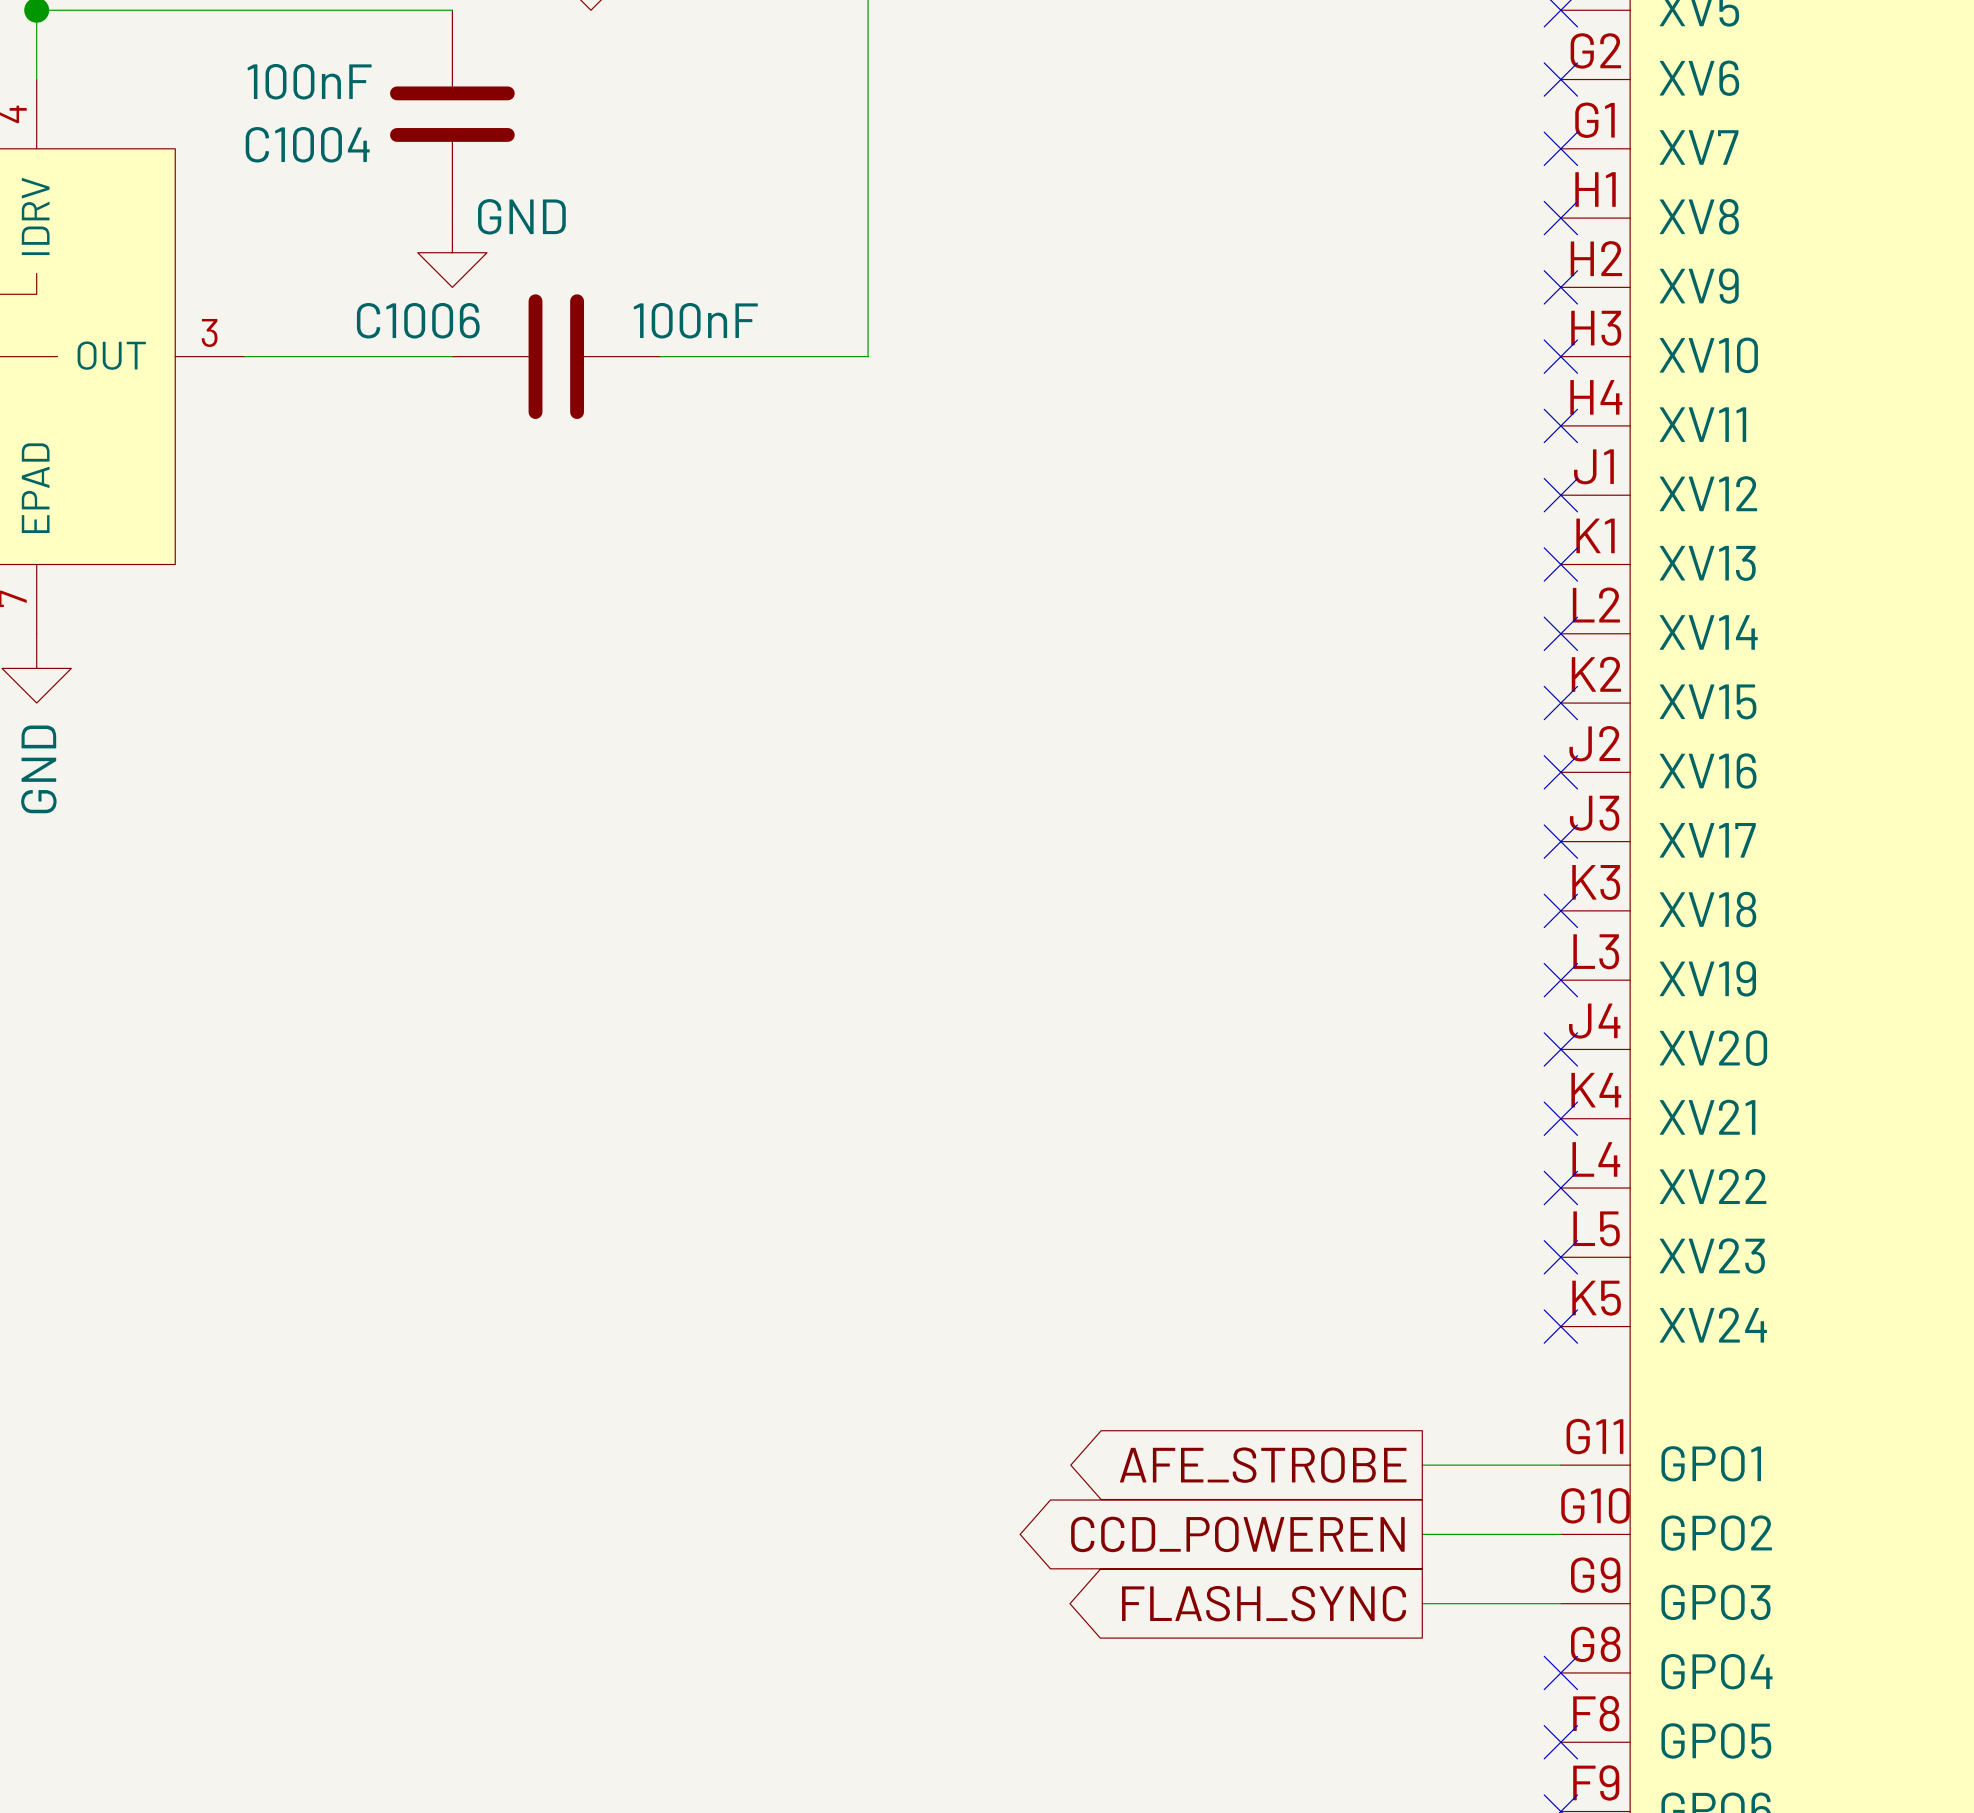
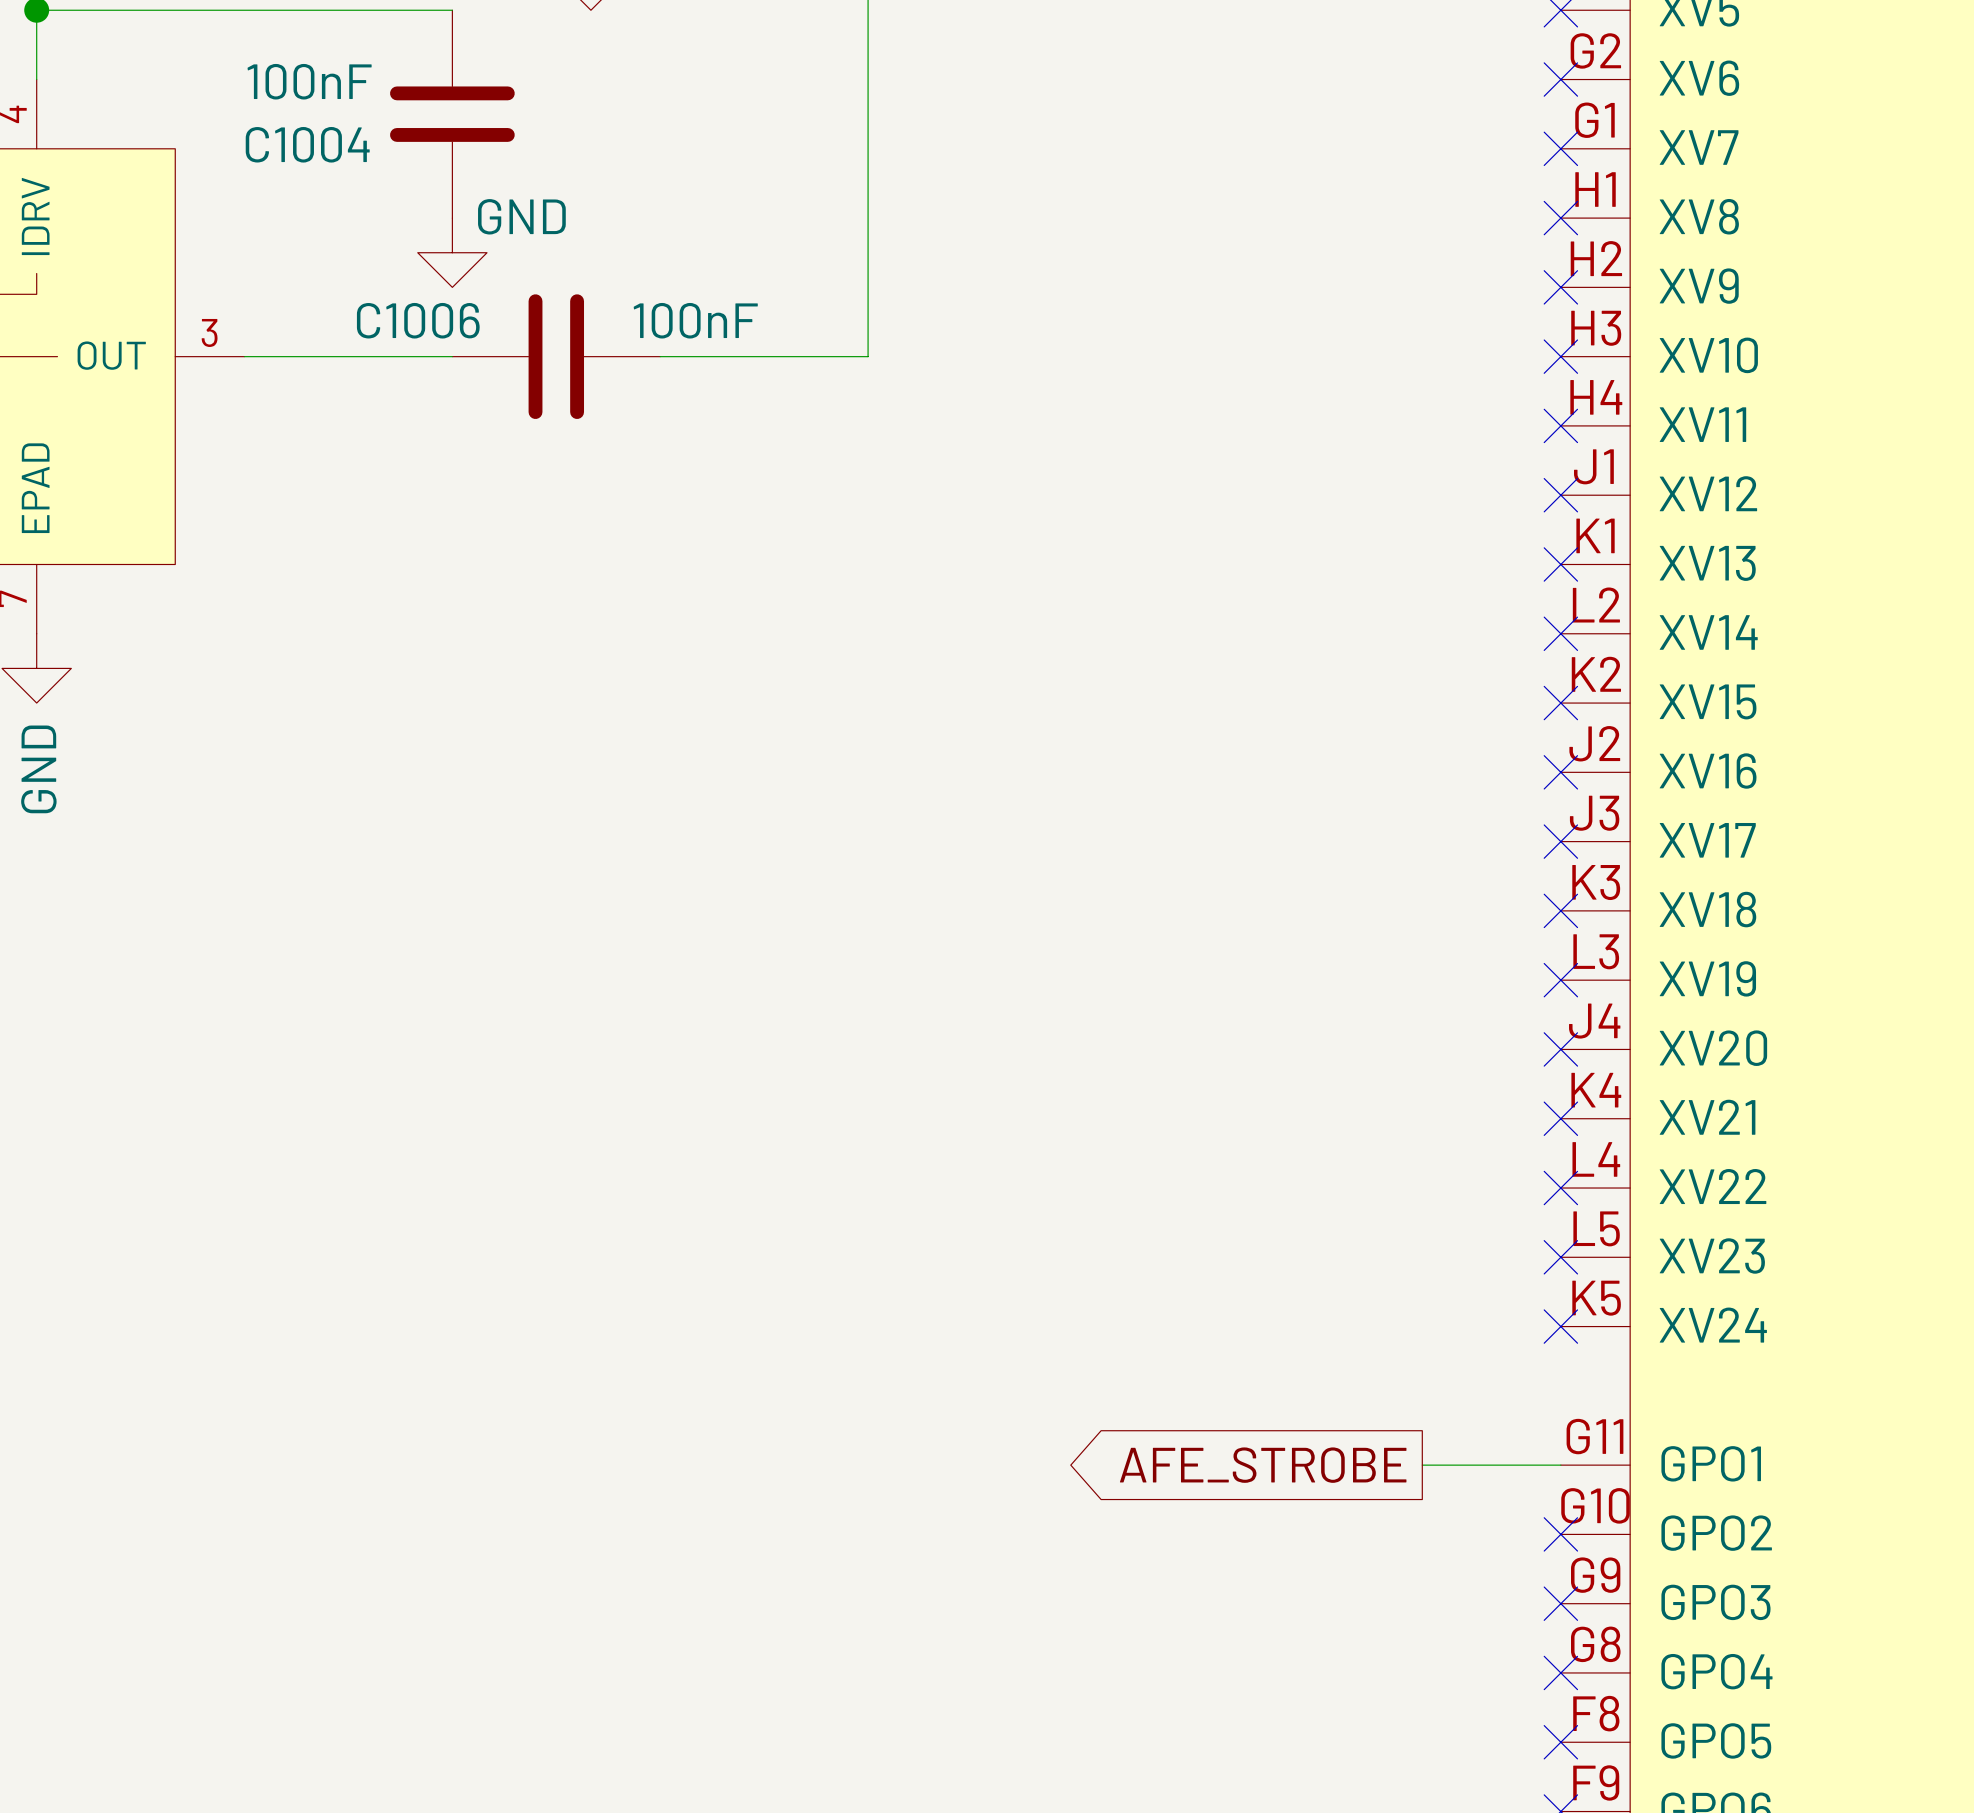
global label: CCD_POWEREN (1237, 1534) -> none
wire: (1422, 1534) (1560, 1534) -> none
no-connect mark: none -> (1560, 1534)
global label: FLASH_SYNC (1264, 1603) -> none
wire: (1422, 1603) (1560, 1603) -> none
no-connect mark: none -> (1560, 1603)

